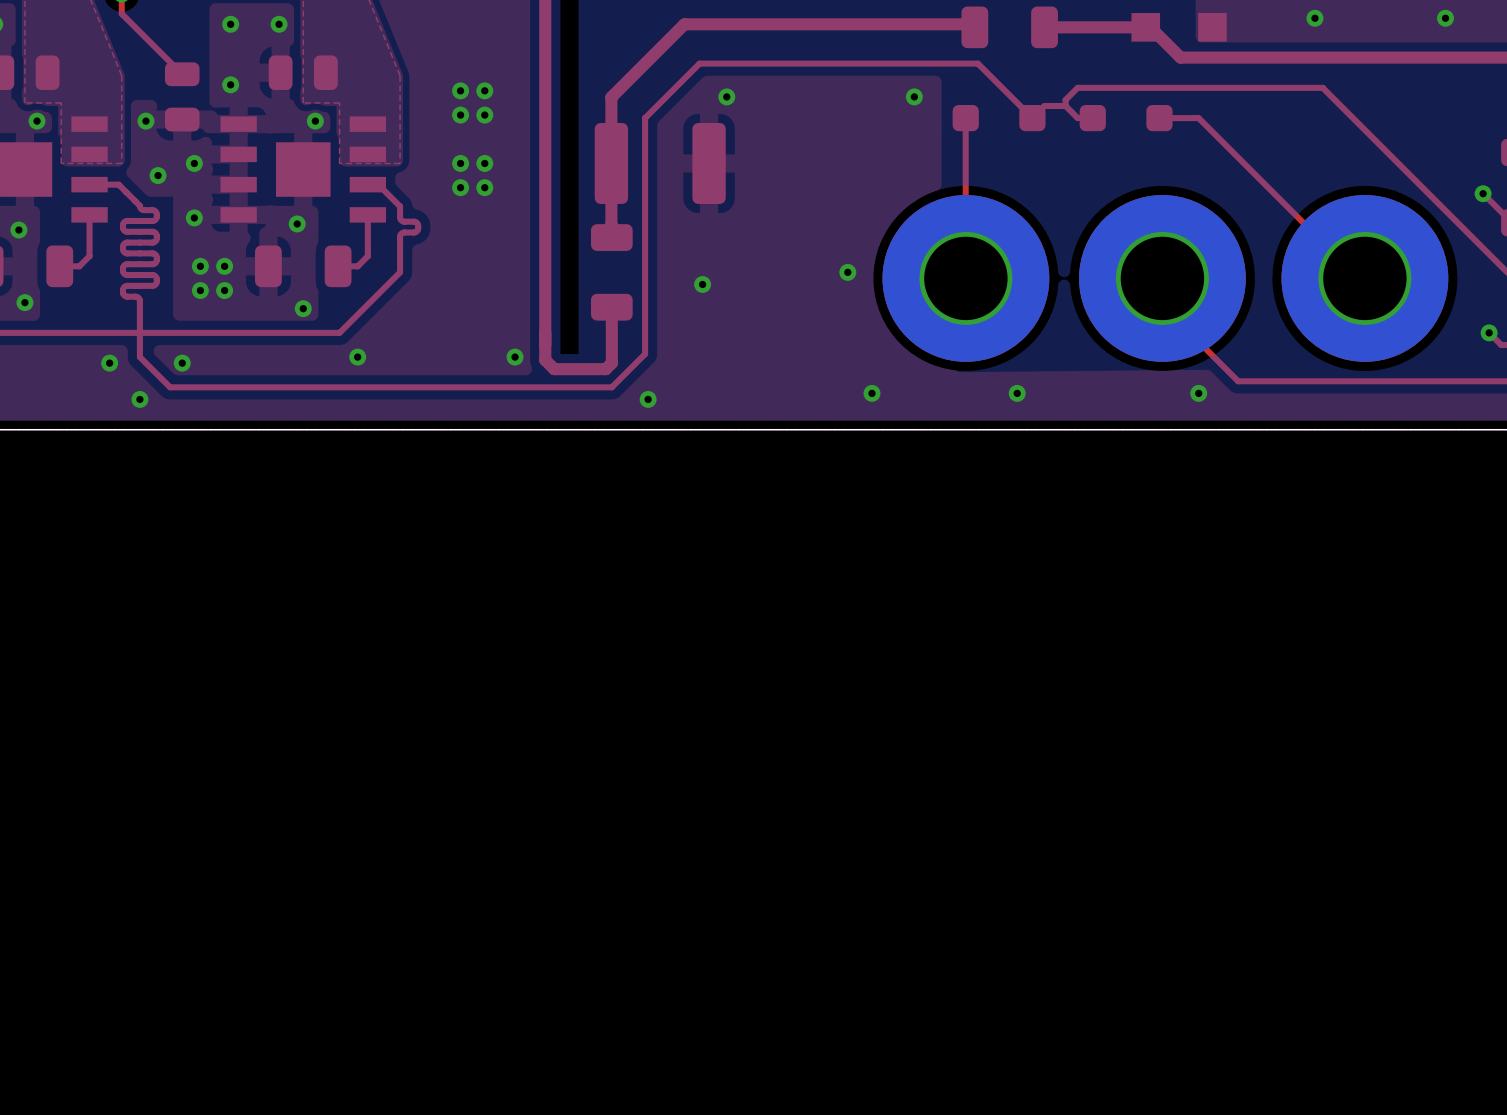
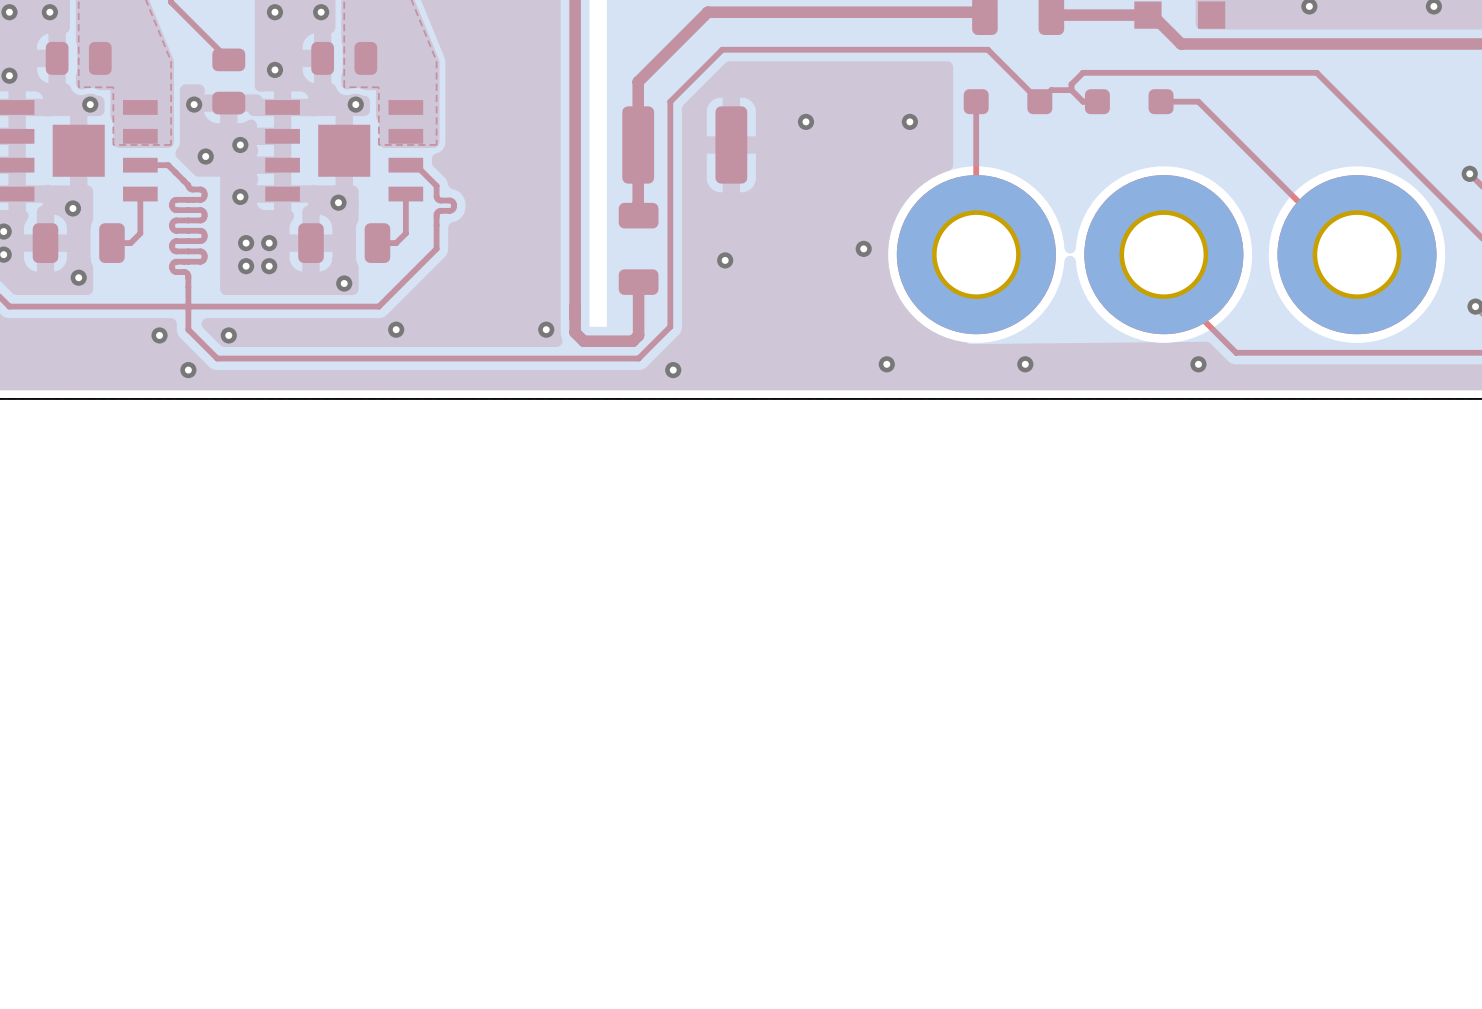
via: (460, 90) -> none
via: (484, 90) -> none
via: (726, 96) -> none
via position: (914, 96) -> (909, 121)
via: (460, 115) -> none
via: (484, 115) -> none
via: none -> (805, 121)
via: (460, 163) -> none
via: (484, 163) -> none
via: (460, 187) -> none
via: (484, 187) -> none

